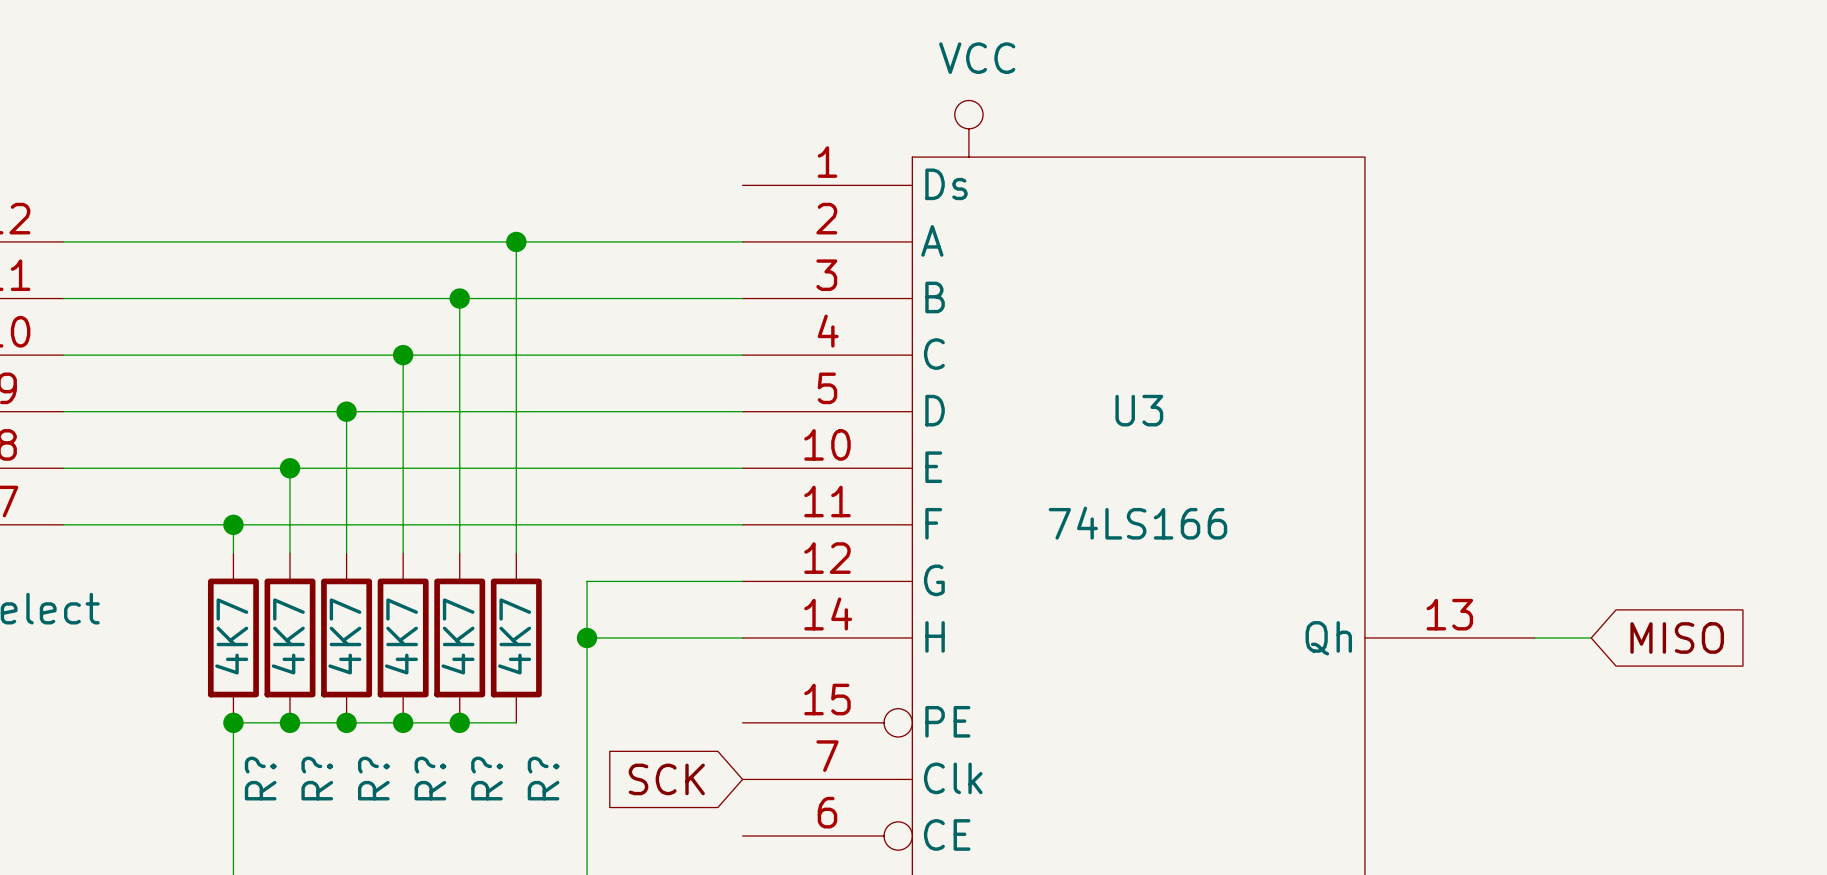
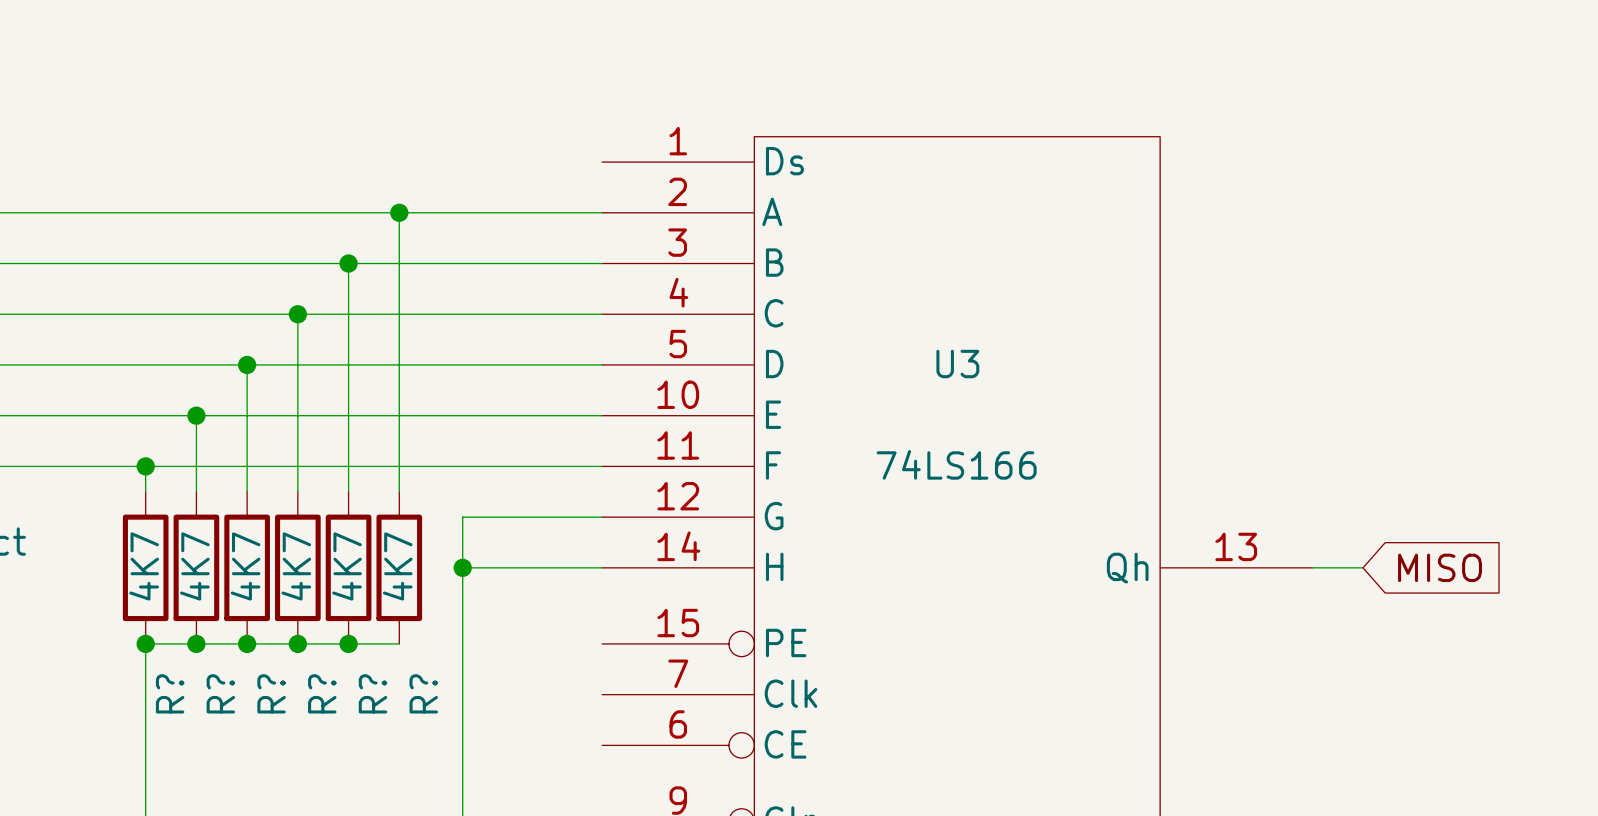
power symbol: VCC (968, 128) -> none
global label: SCK (666, 779) -> none

